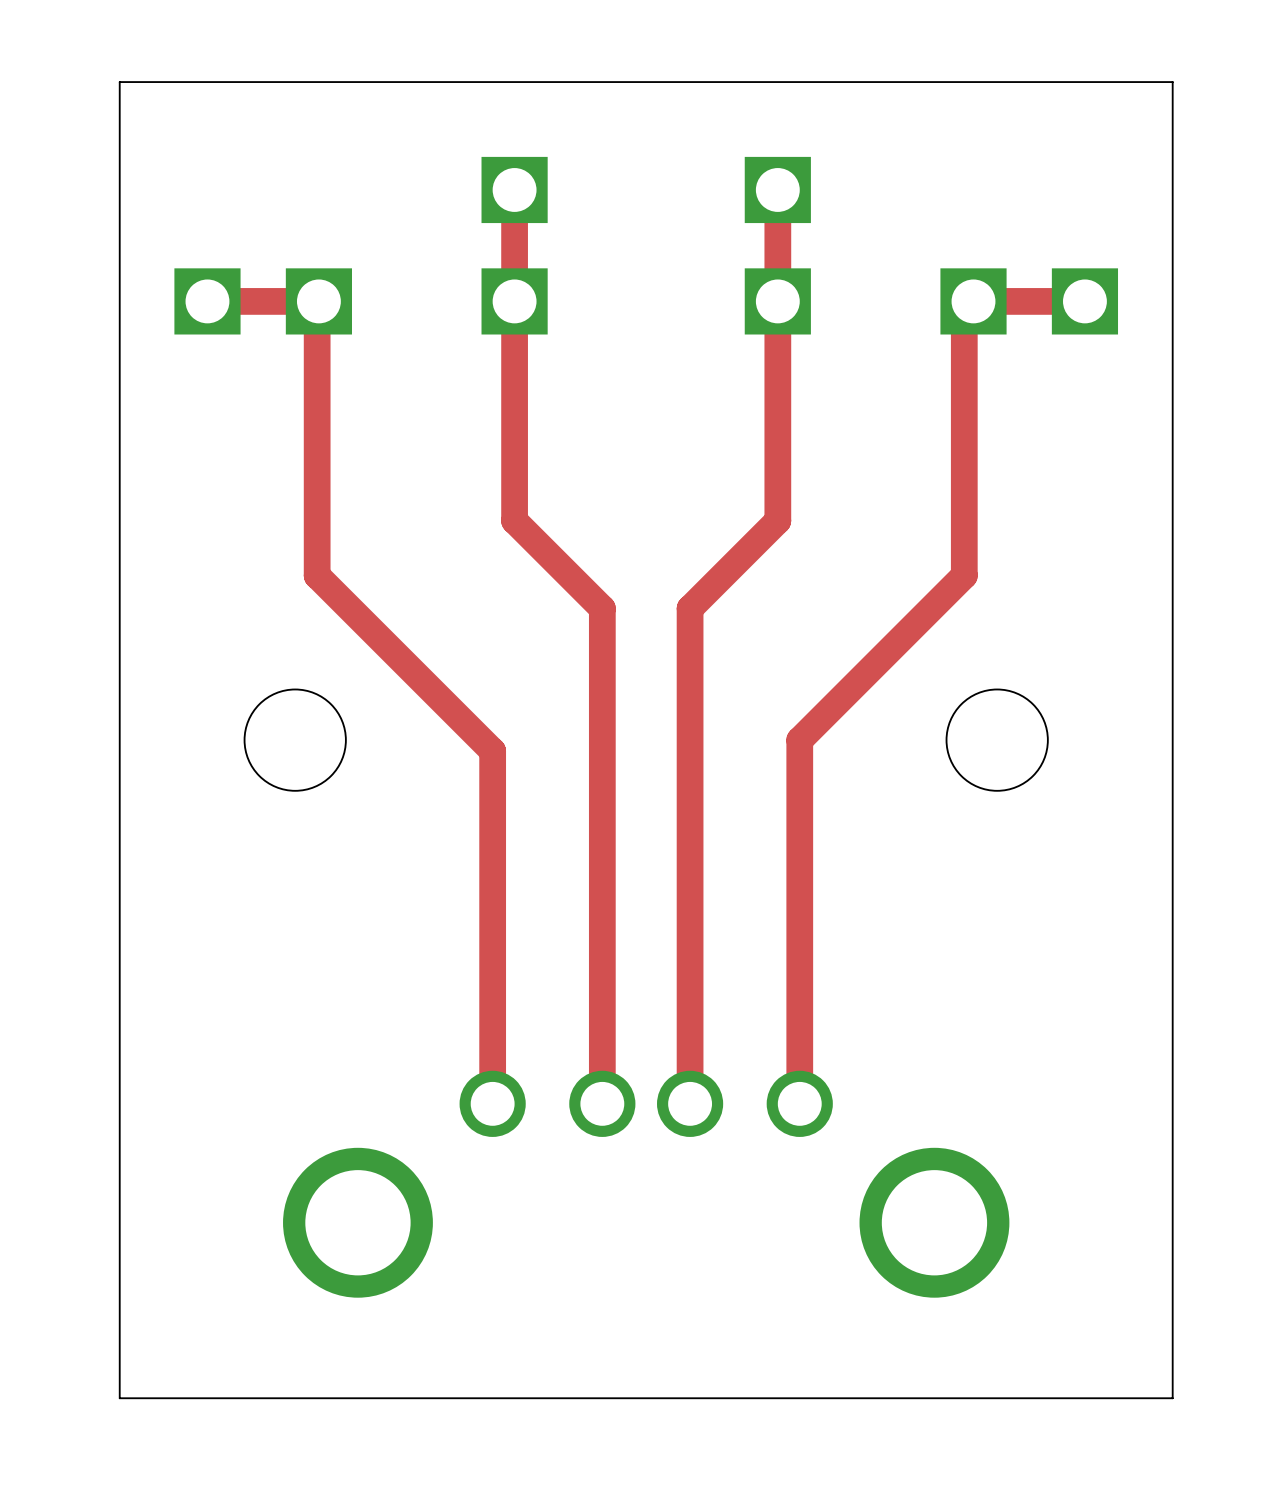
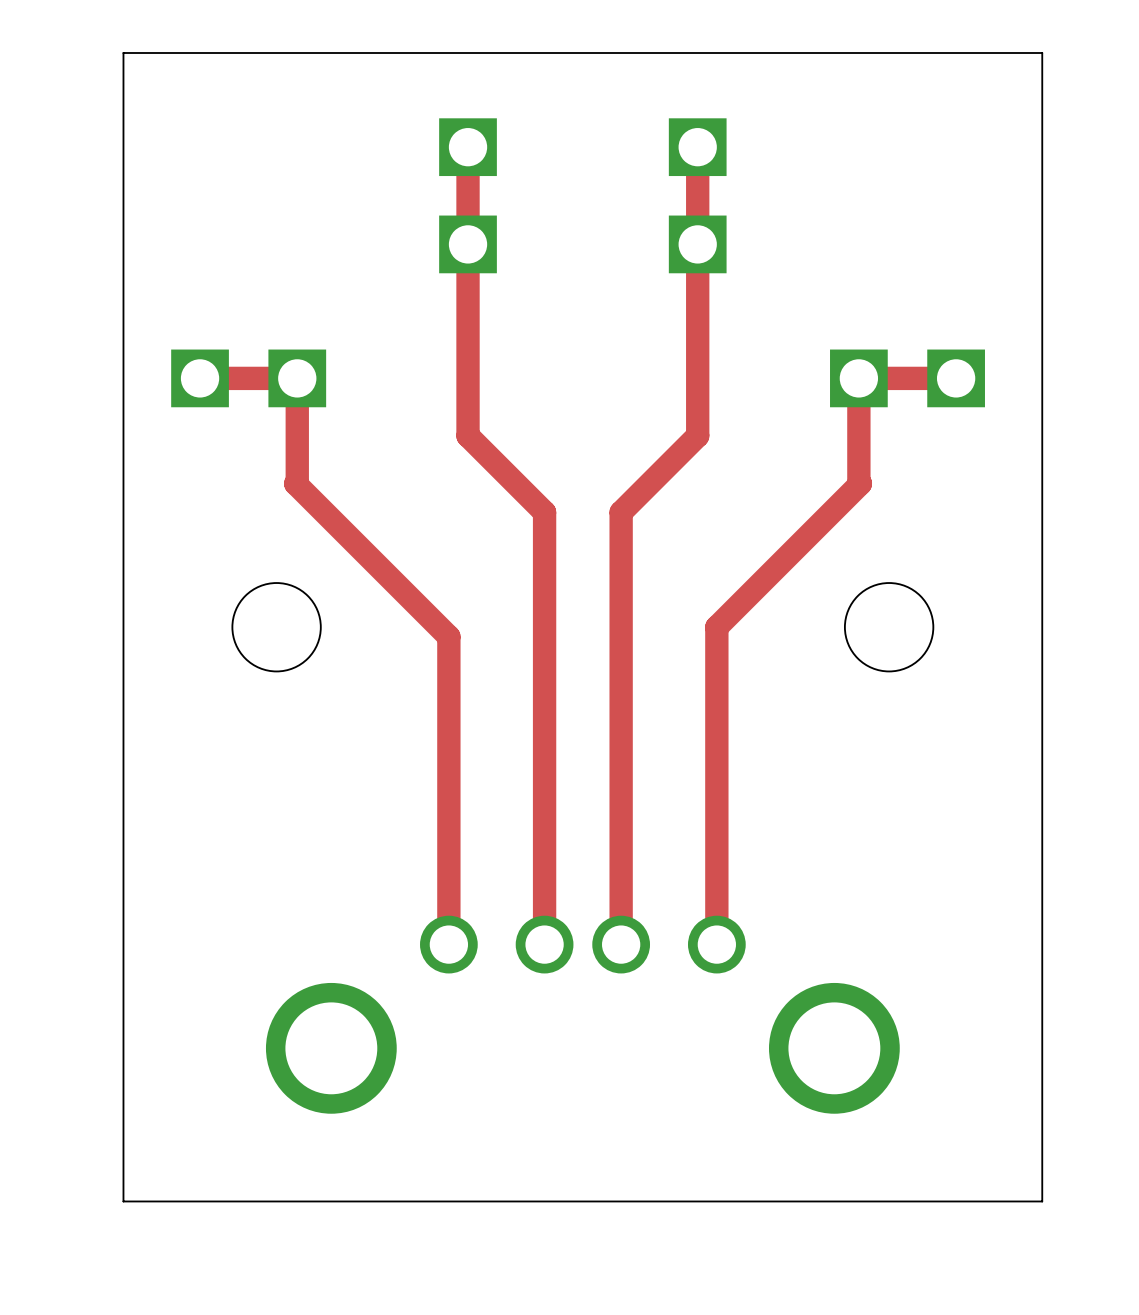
top track: (207, 301) (318, 301) (317, 303) (317, 575) -> (200, 378) (297, 378) (297, 483) (295, 483)
part position: (263, 301) -> (248, 378)
part position: (1029, 301) -> (907, 378)
top track: (1084, 301) (973, 301) (964, 310) (964, 575) -> (956, 378) (858, 378) (858, 483) (860, 483)

